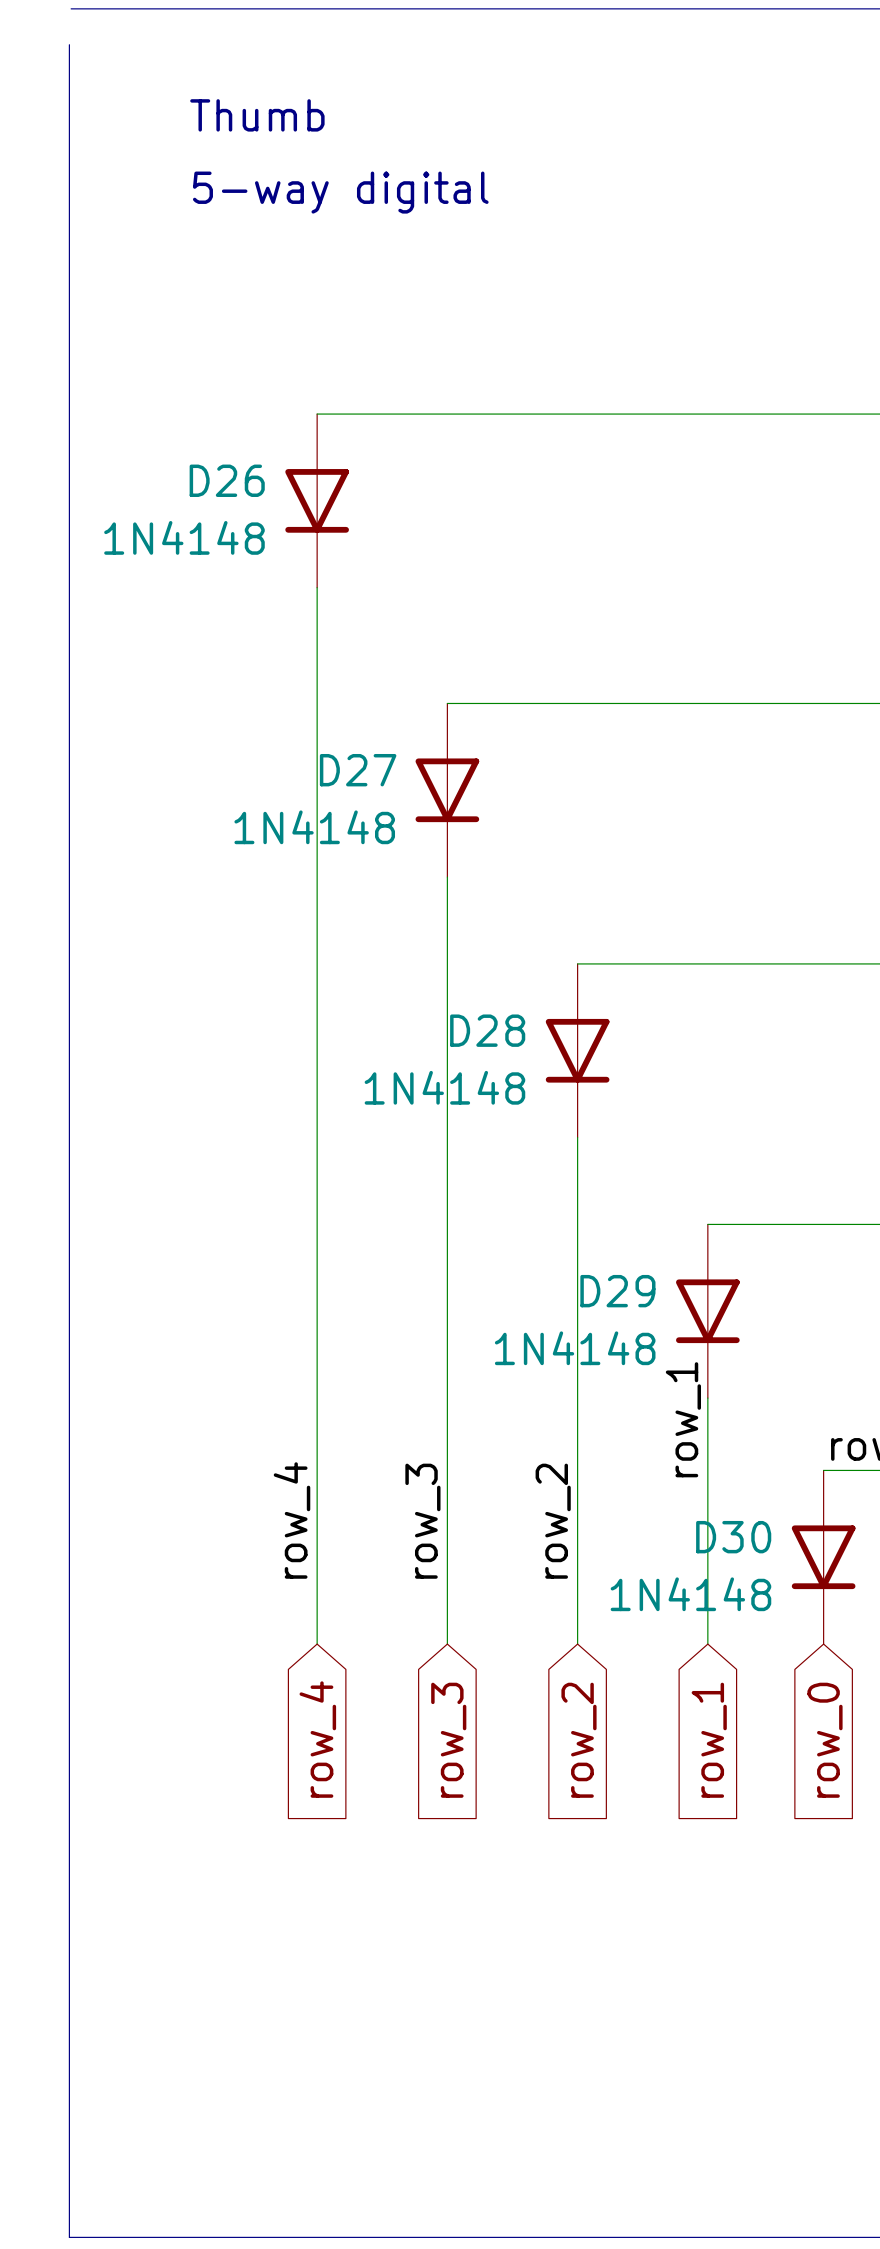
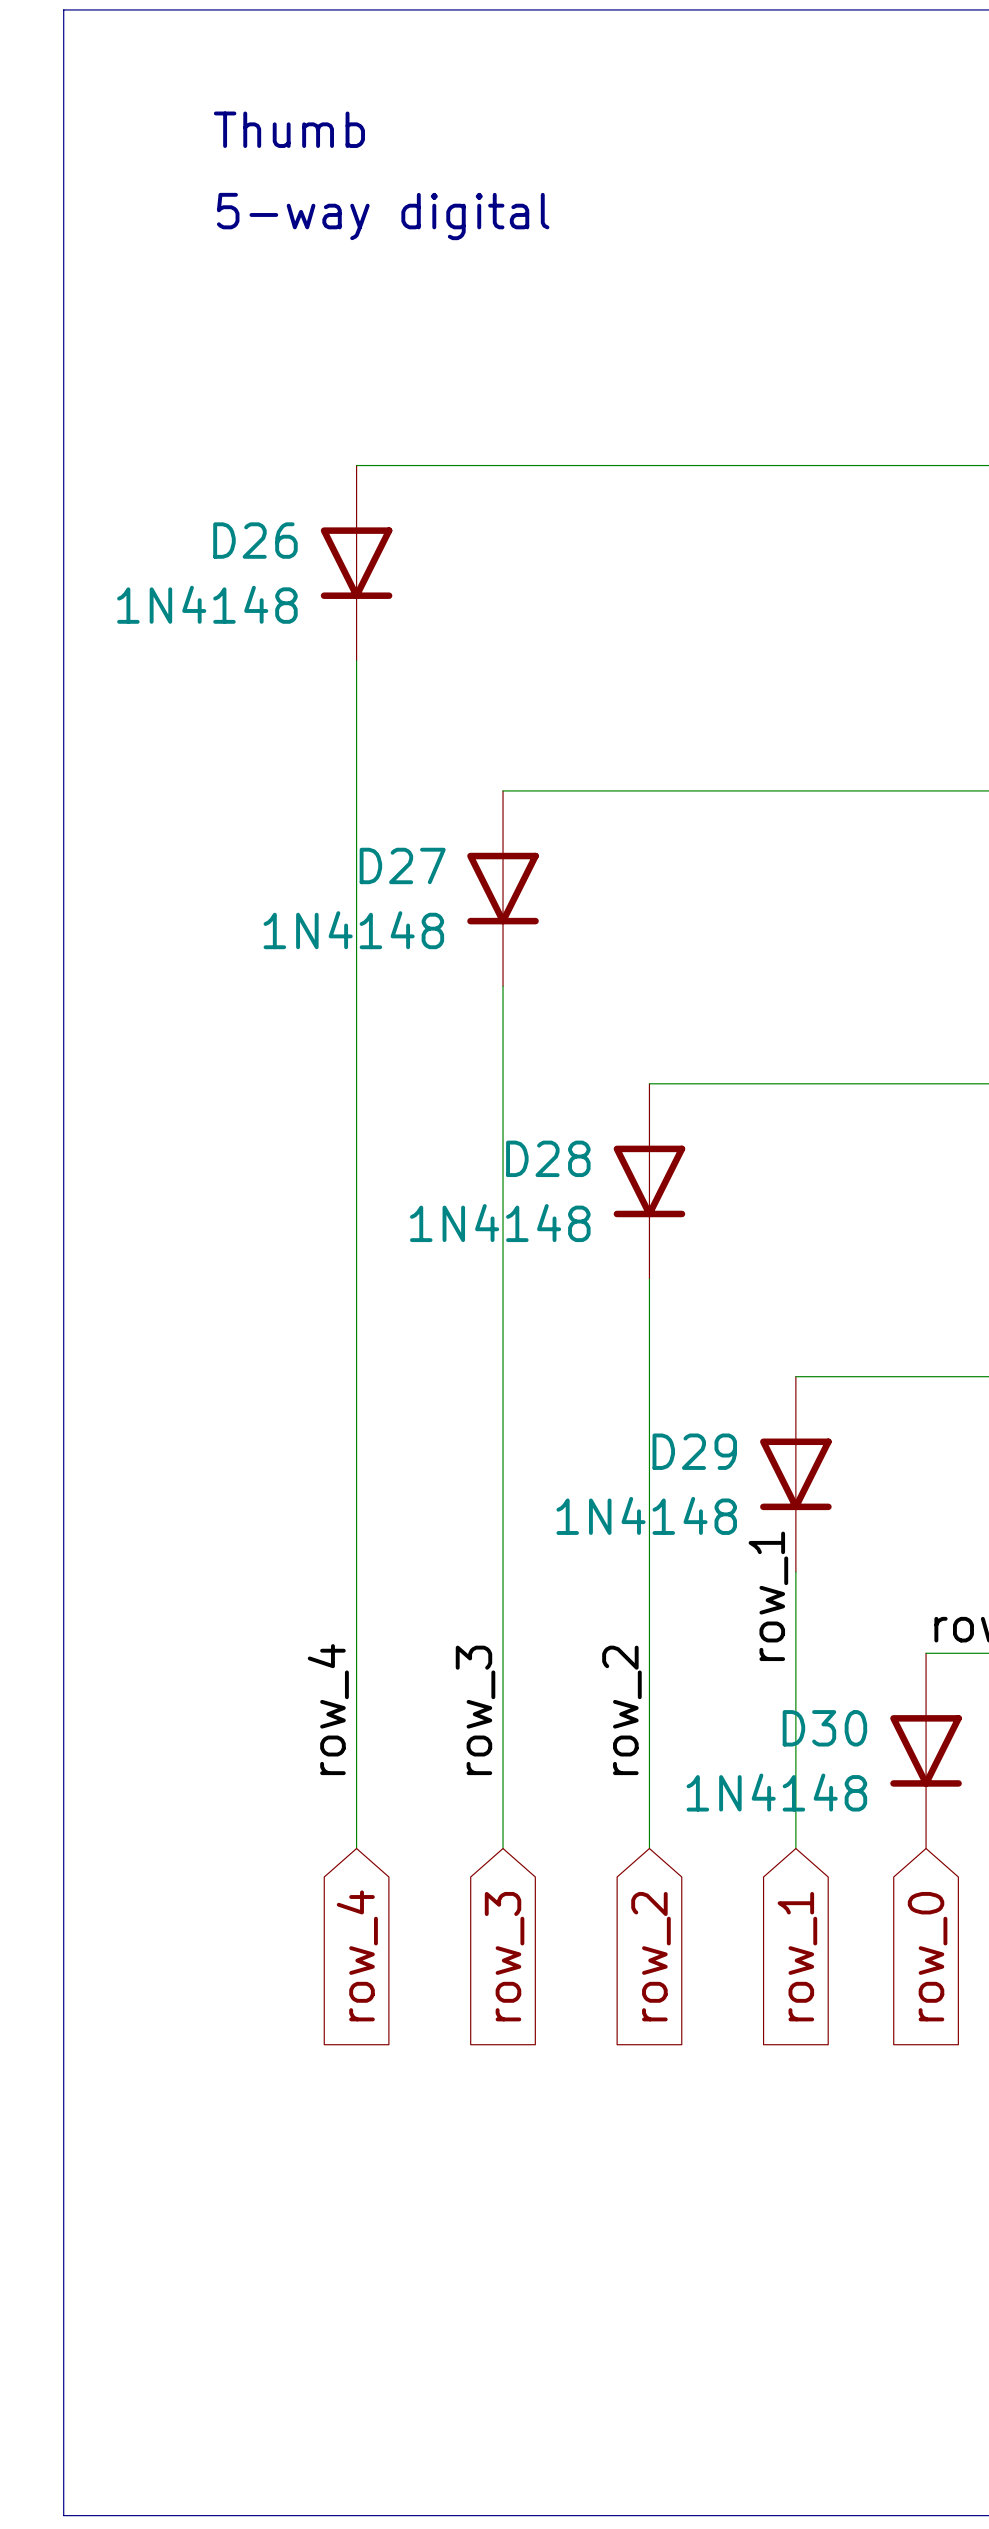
line: (69, 44) (69, 2237) -> (79, 9) (63, 9) (63, 2515) (78, 2515)

